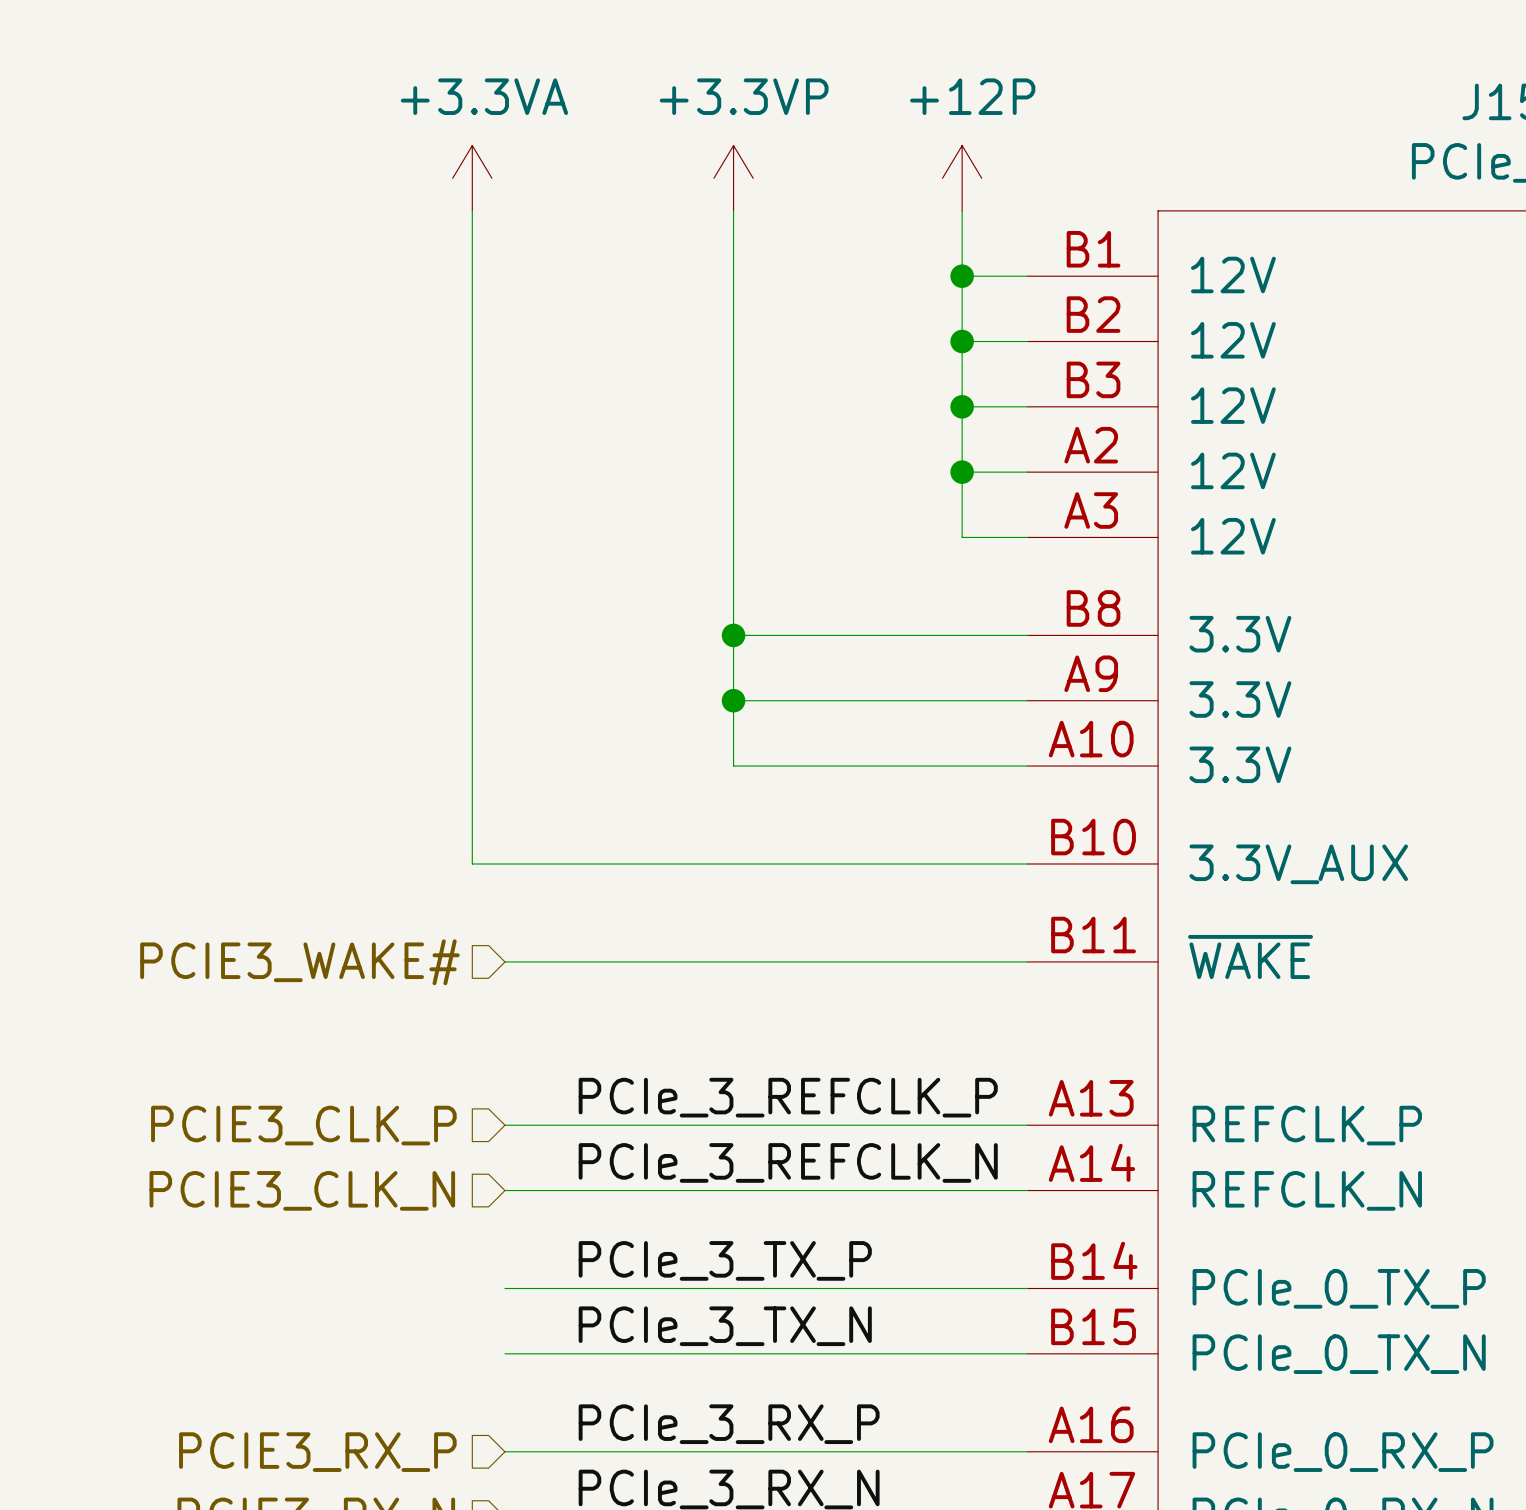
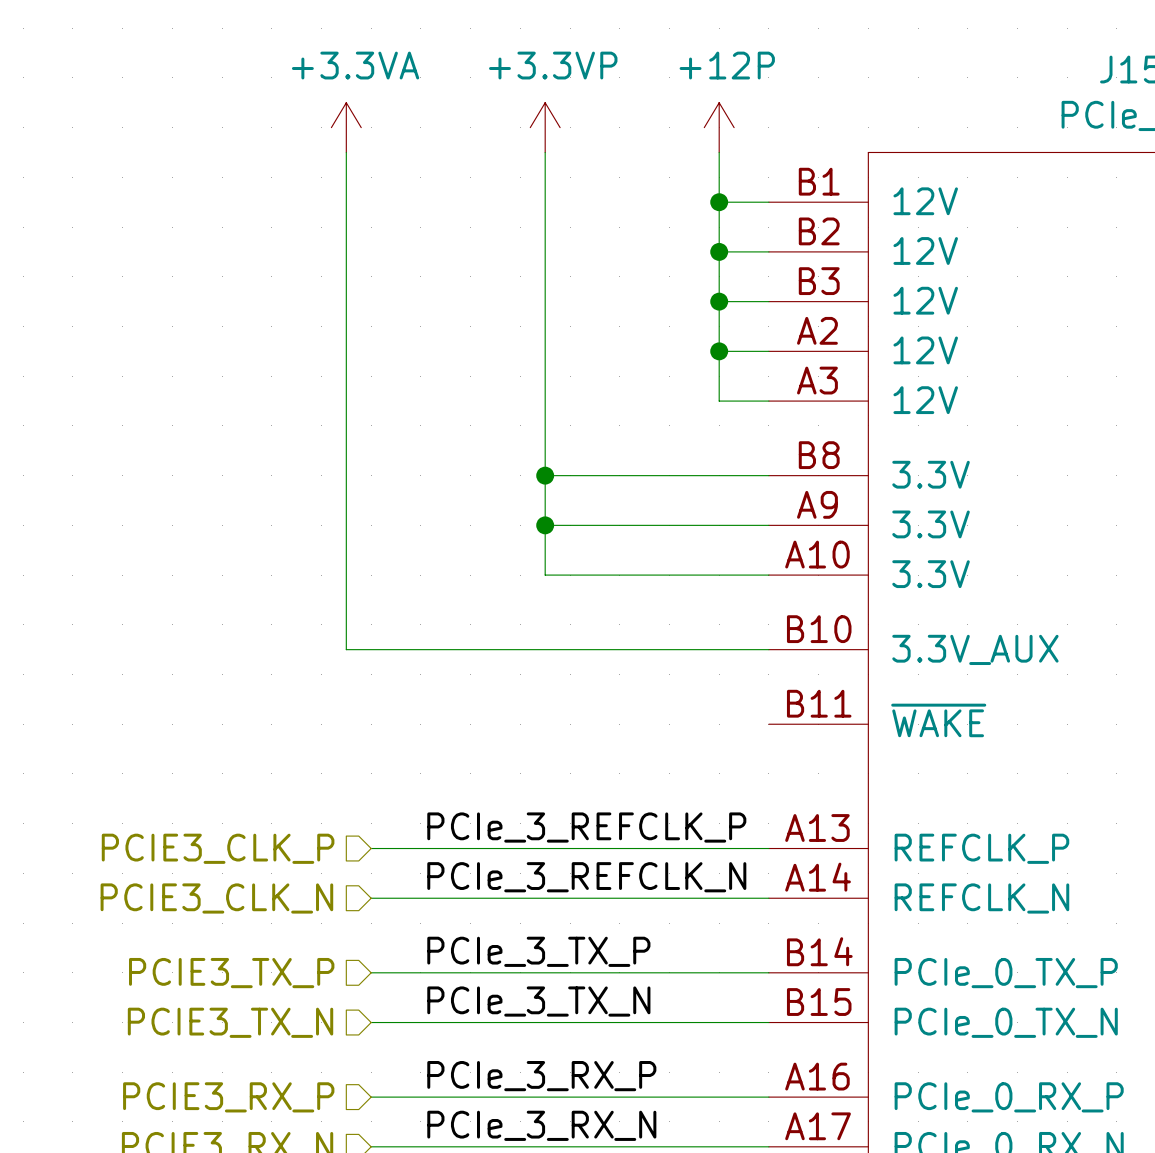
wire: (504, 961) (1027, 961) -> none
hierarchical label: PCIE3_WAKE# (299, 962) -> none
hierarchical label: none -> PCIE3_TX_P (231, 973)
hierarchical label: none -> PCIE3_TX_N (230, 1022)

